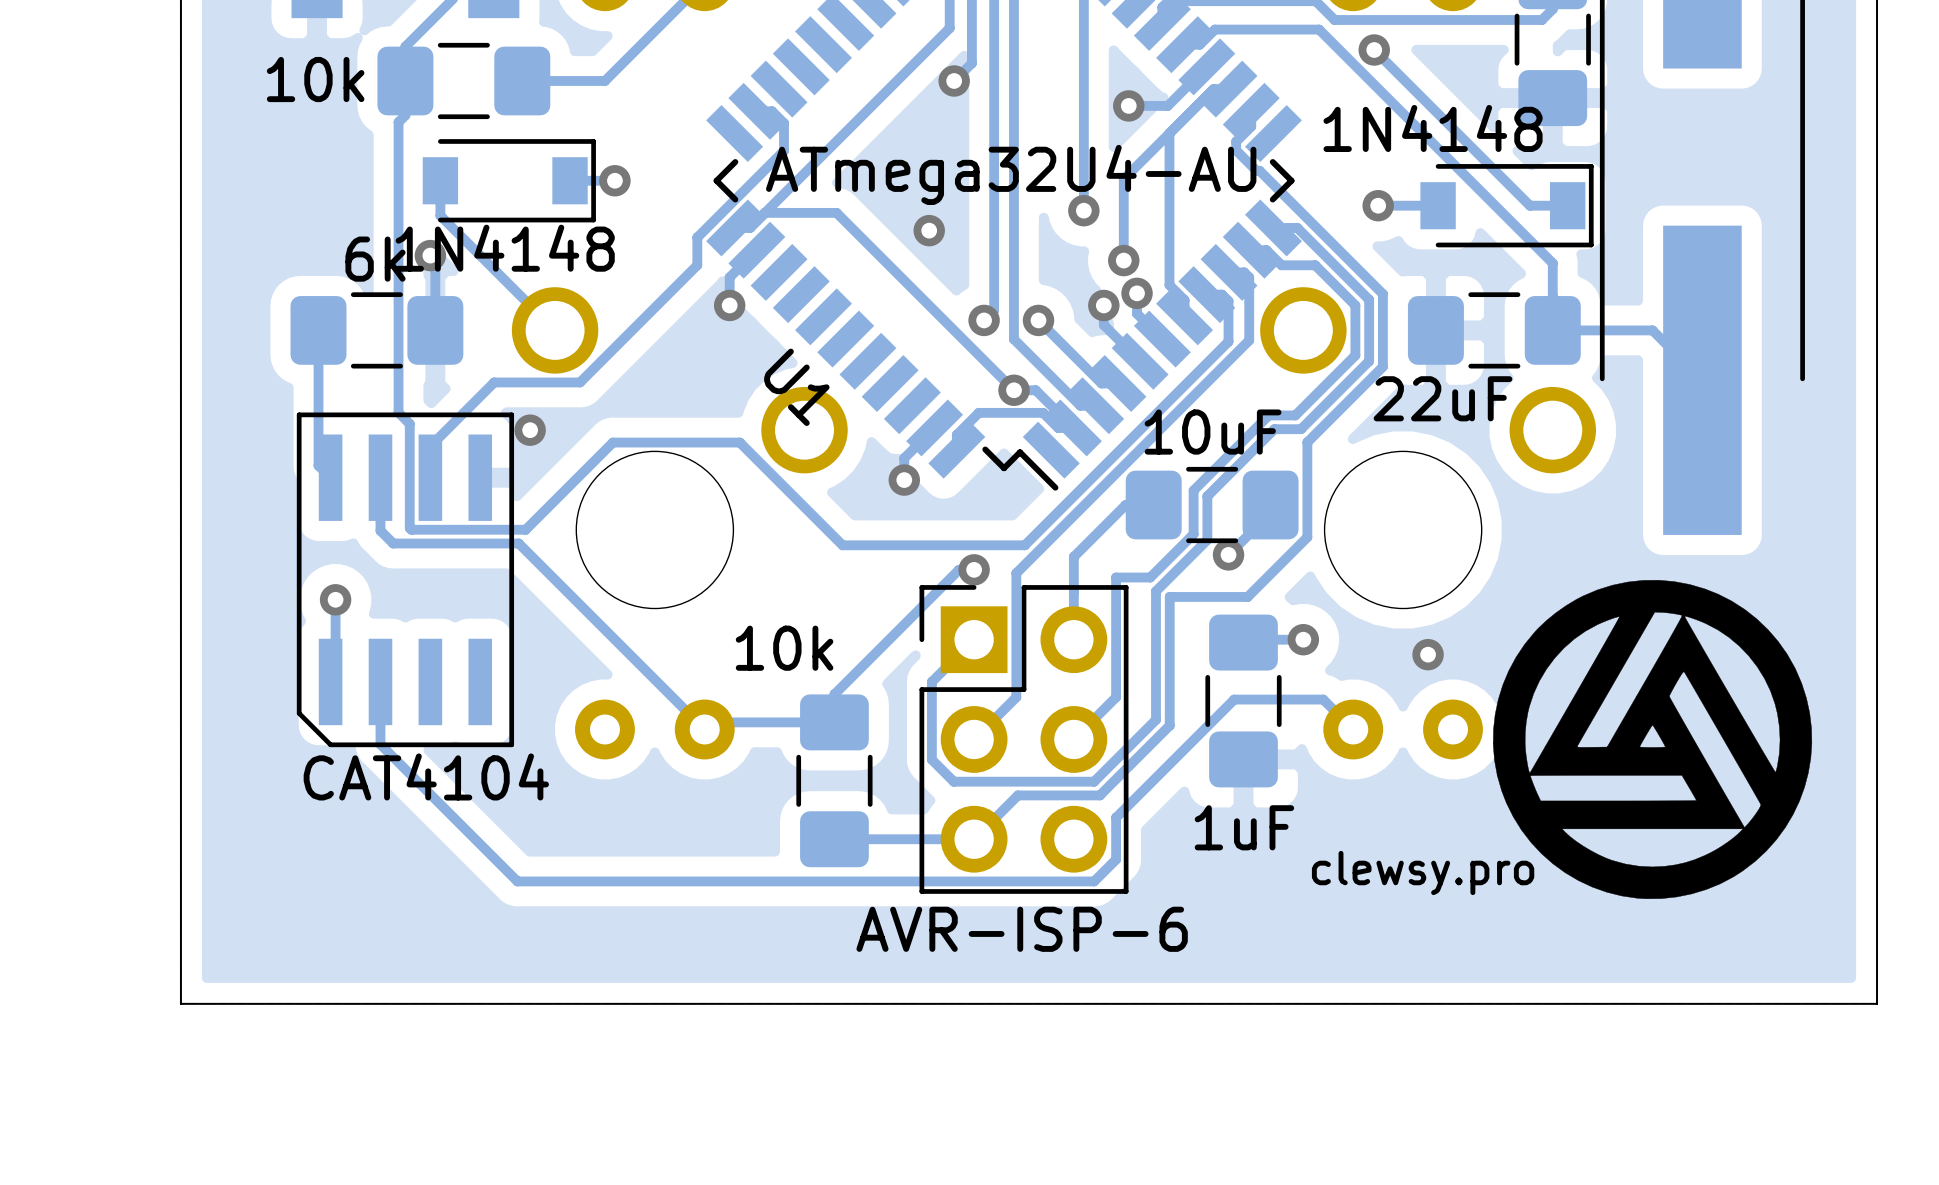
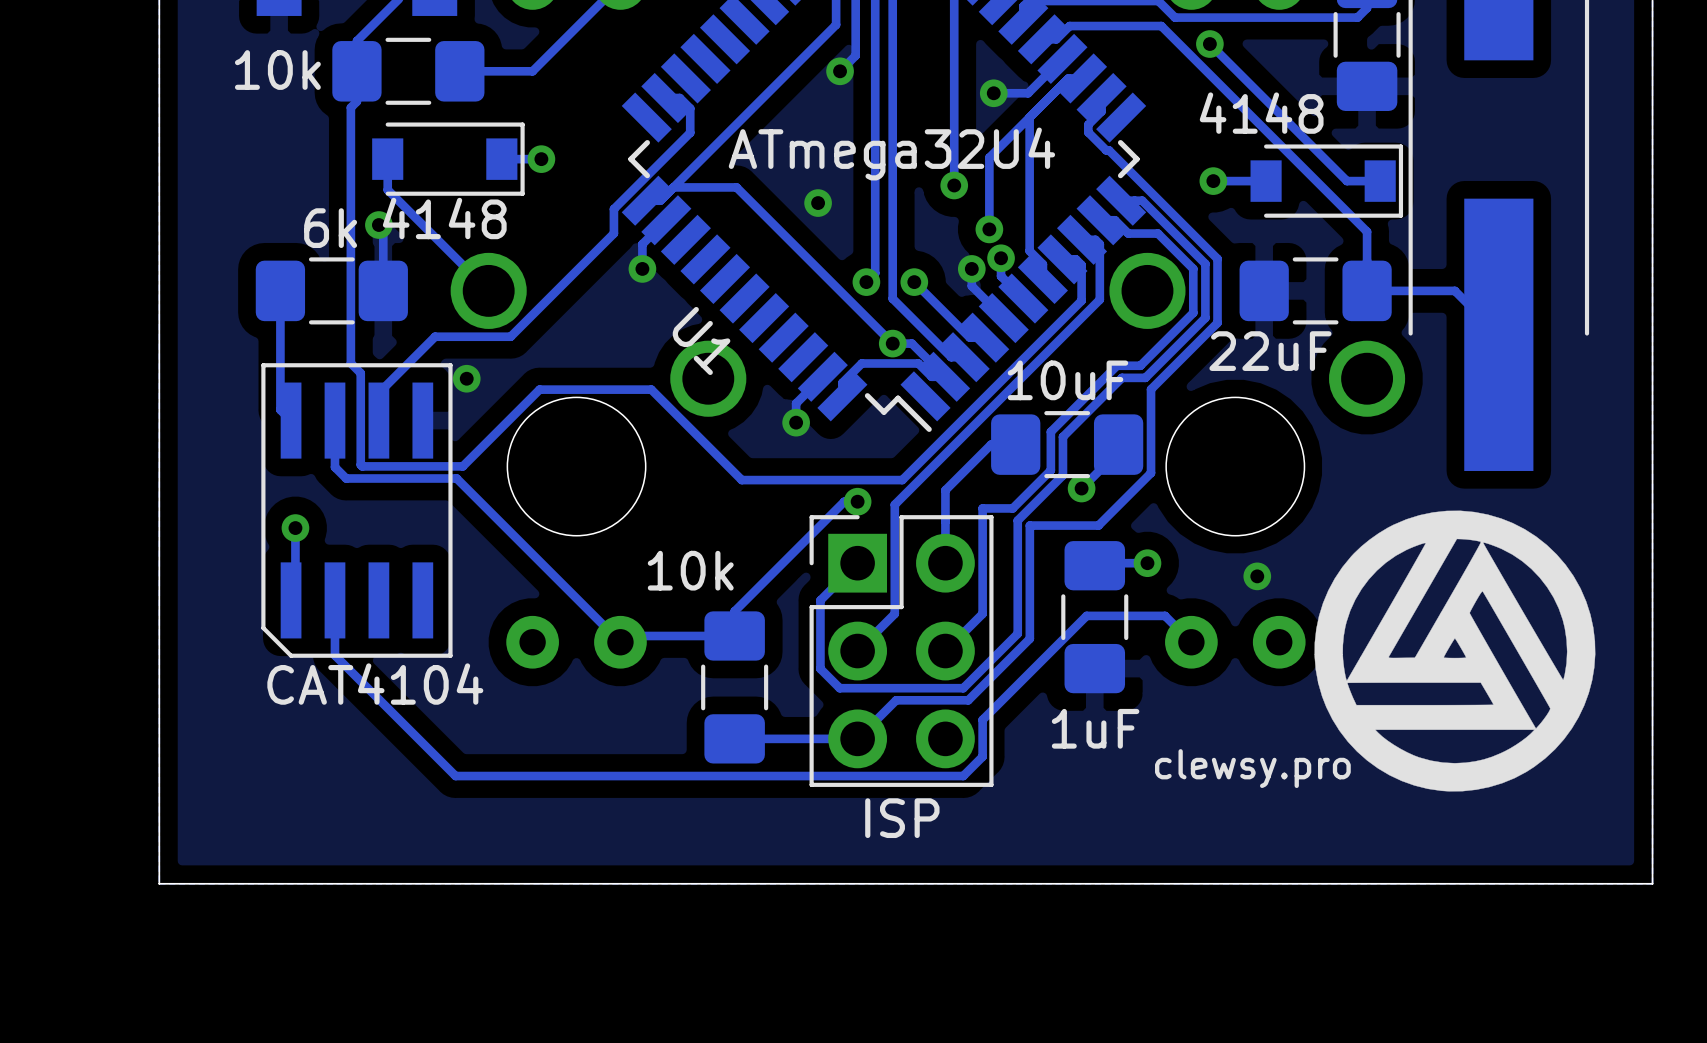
part value: 1N4148 (1433, 128) -> 4148 (1261, 113)
U1 value: ATmega32U4-AU (1011, 174) -> ATmega32U4 (891, 154)
part value: 1N4148 (505, 248) -> 4148 (444, 218)
part value: AVR-ISP-6 (1022, 929) -> ISP (902, 818)

